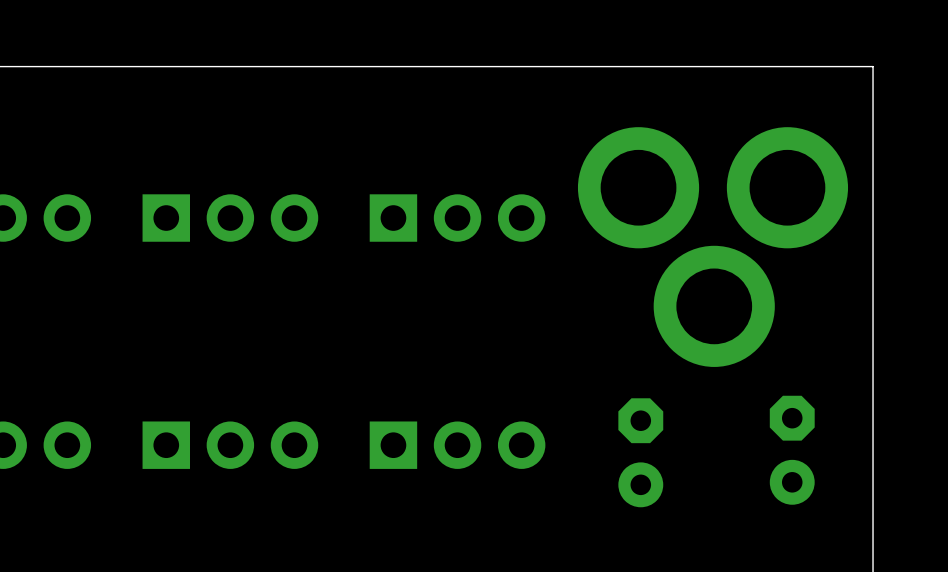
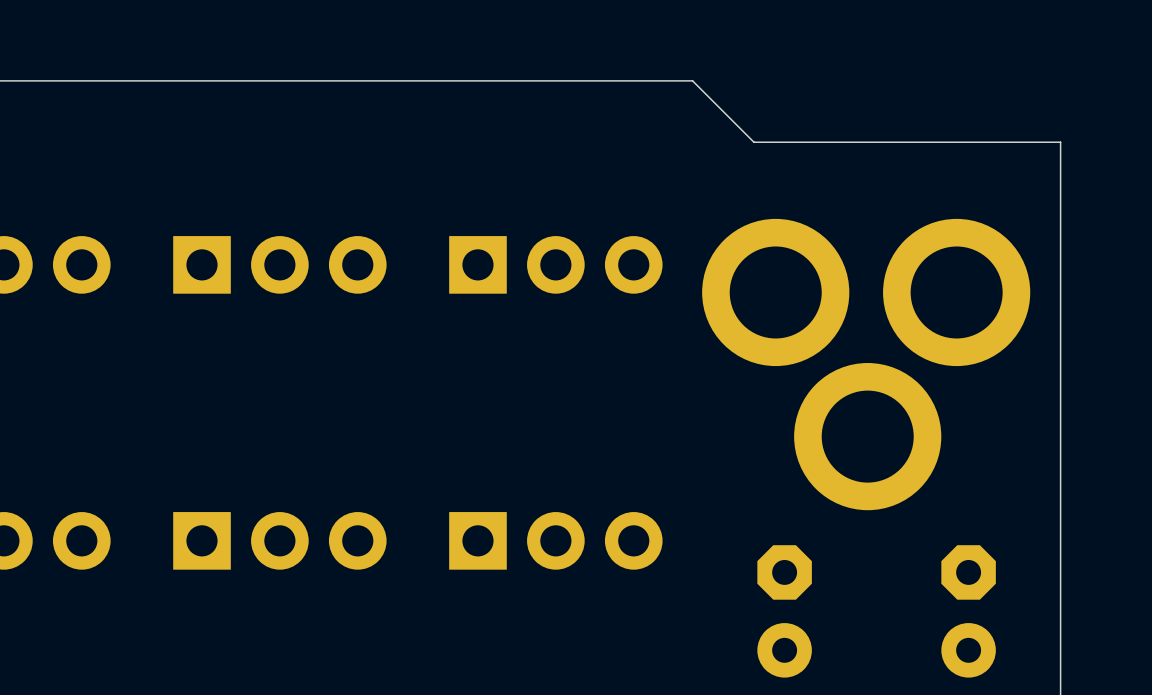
board edge: (570, 66) (873, 66) (873, 117) -> (692, 80) (753, 142) (1060, 142)
part position: (712, 247) -> (866, 364)
part position: (792, 450) -> (968, 611)
part position: (640, 452) -> (784, 611)

